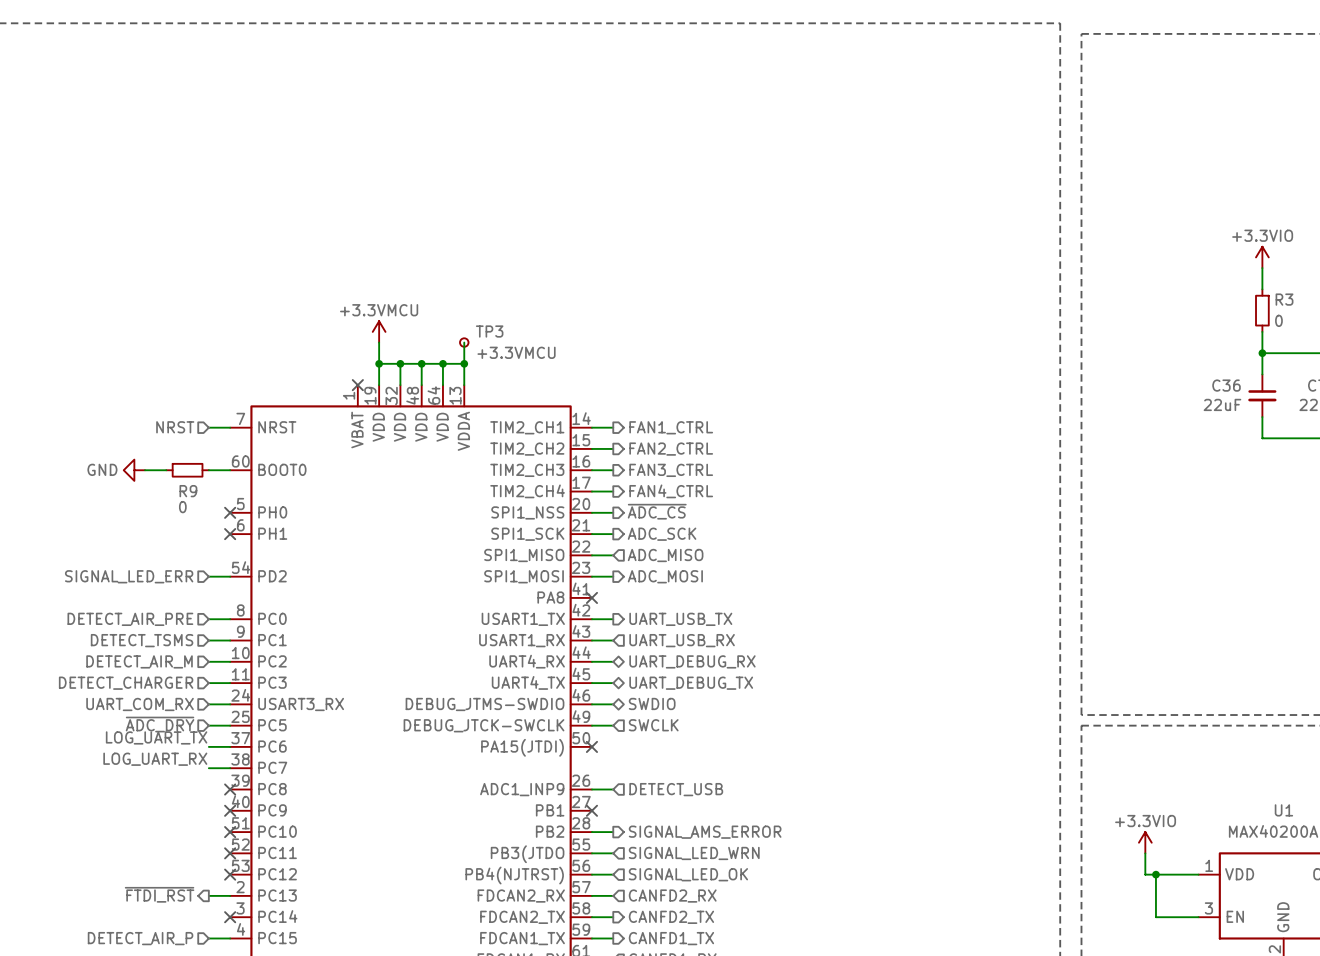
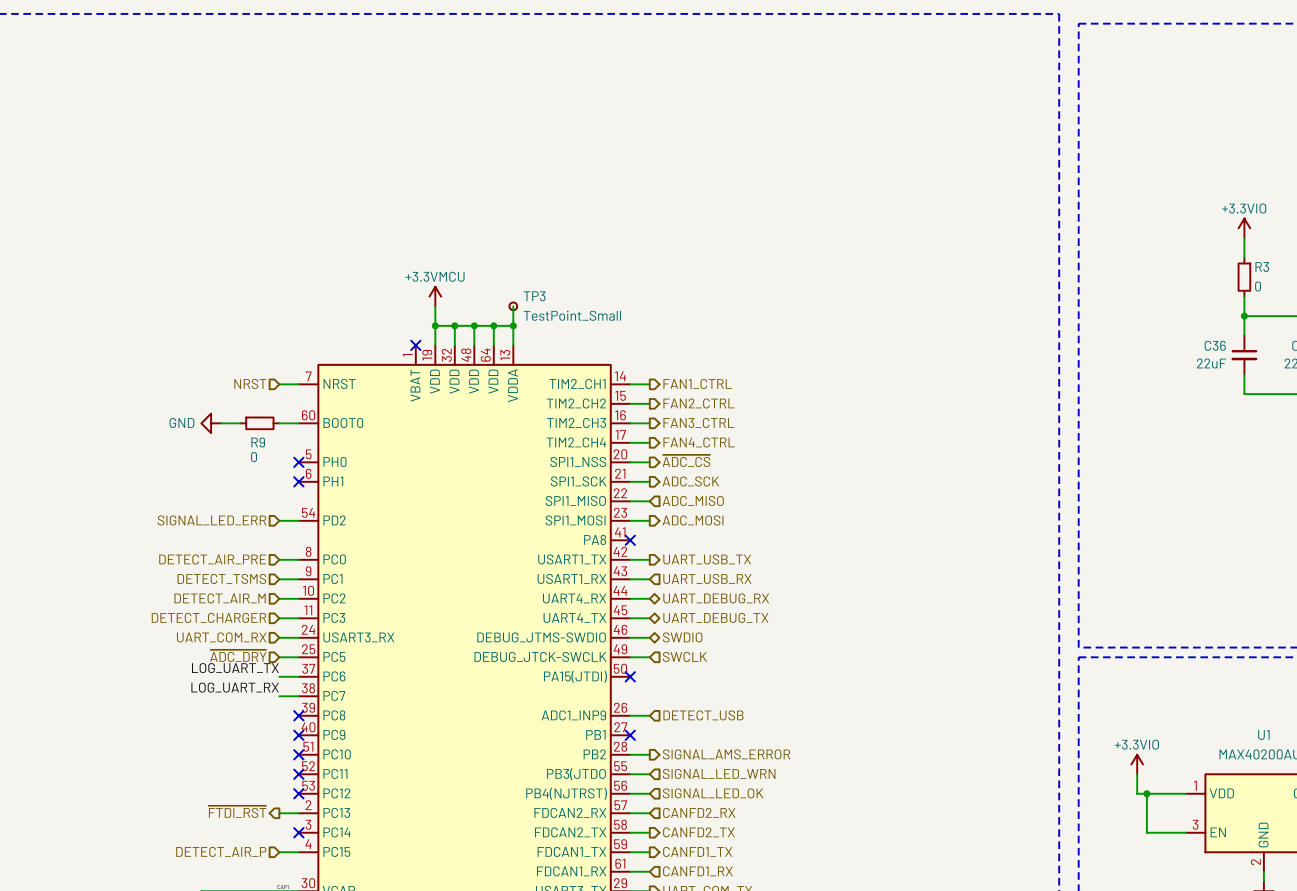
TP3 value: +3.3VMCU (516, 352) -> TestPoint_Small (572, 315)

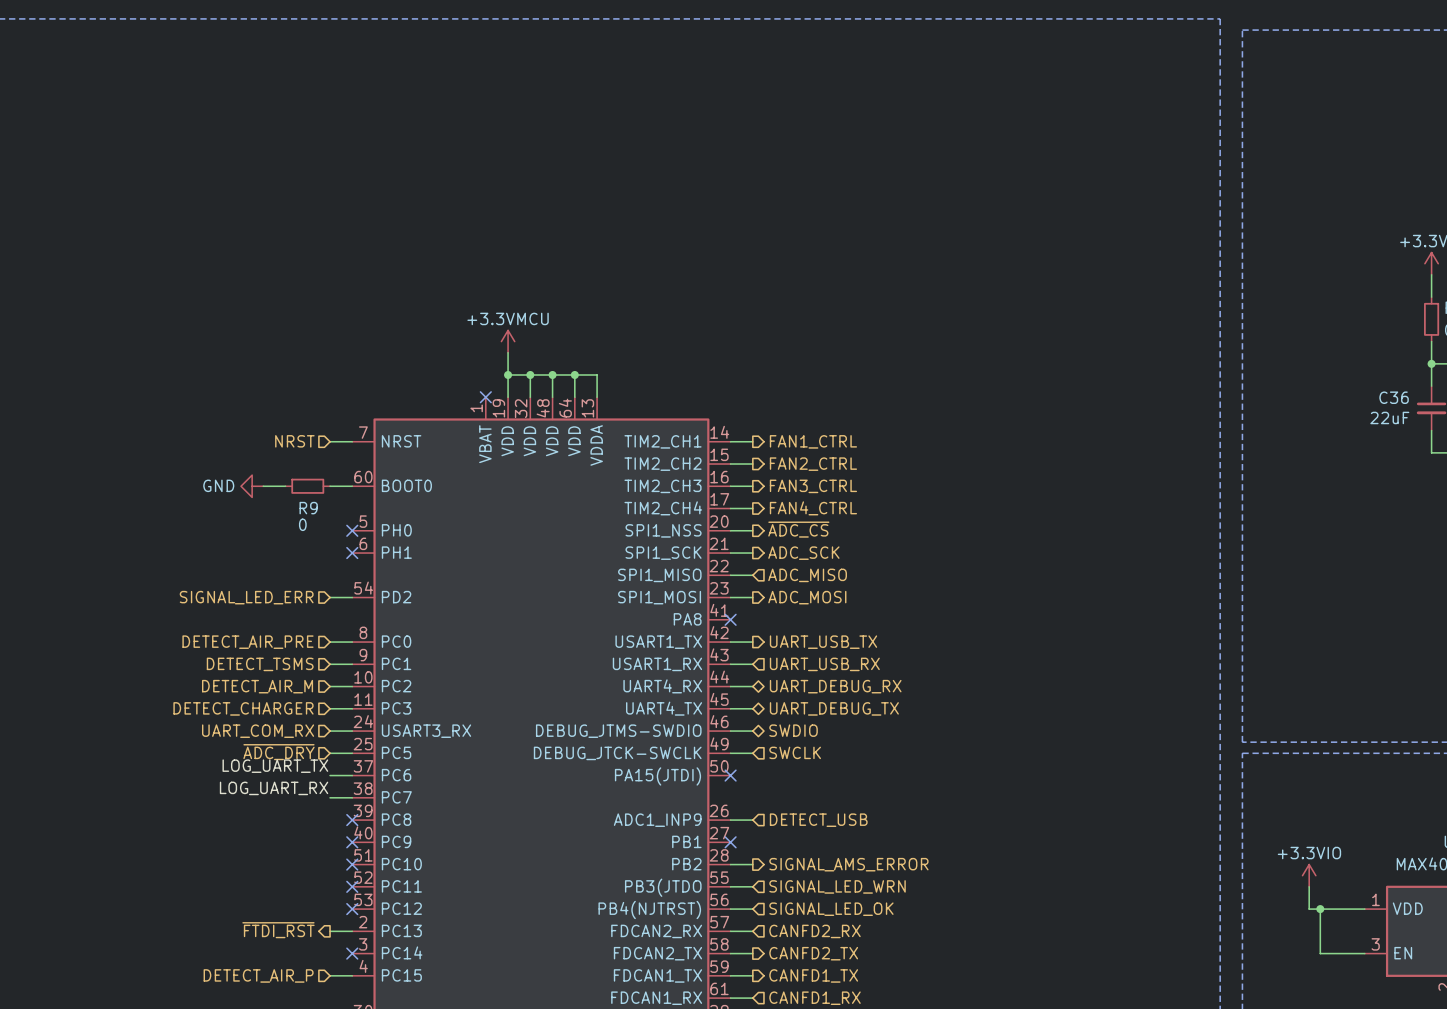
wire: (513, 306) (513, 325) -> none
TP3: TestPoint_Small (513, 306) -> none
junction: (513, 325) -> none

